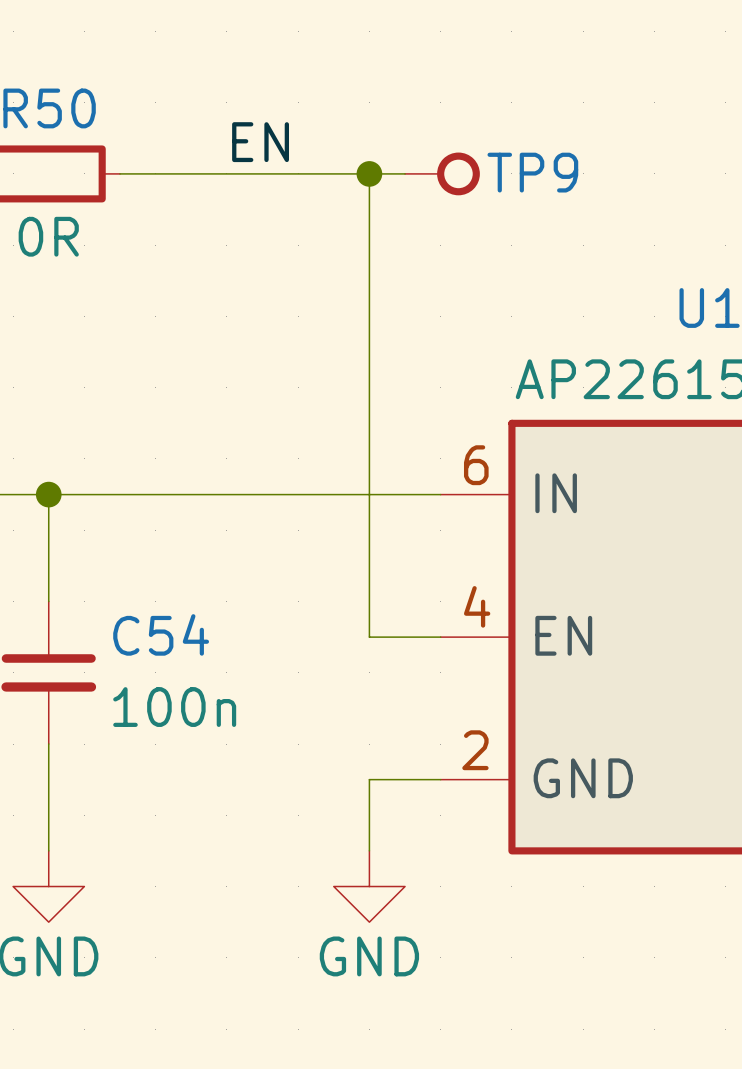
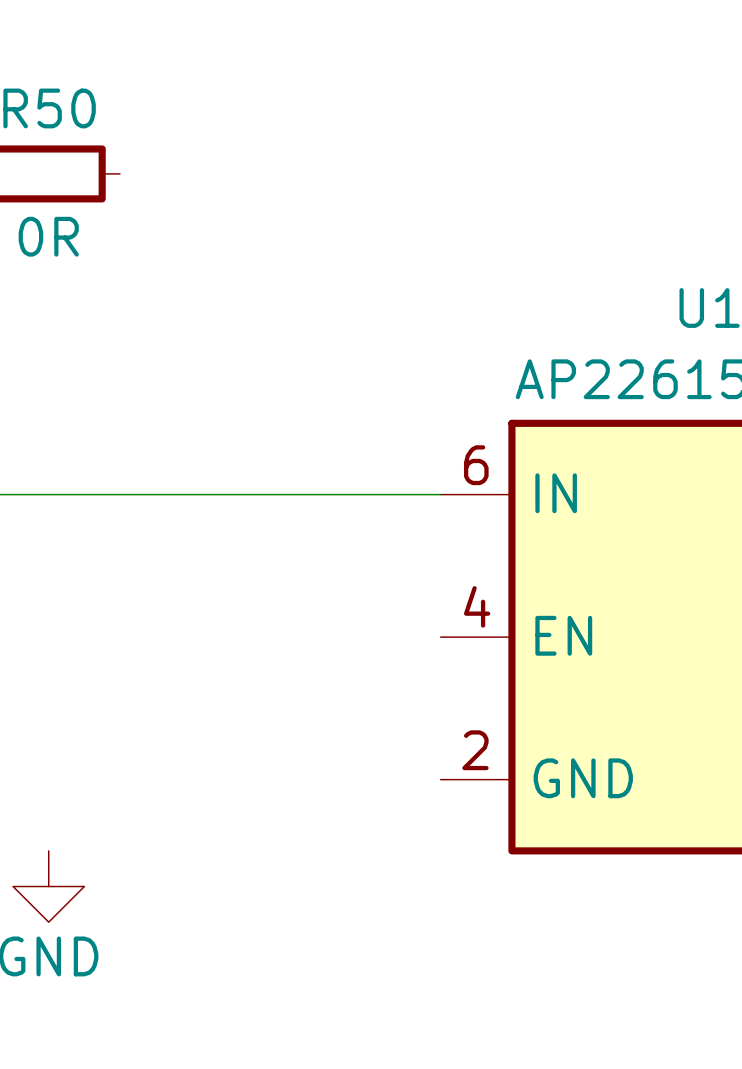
label: EN (260, 142) -> none
wire: (120, 173) (405, 173) -> none
wire: (369, 173) (369, 637) (440, 637) -> none
junction: (369, 173) -> none
TP9: (442, 173) -> none
wire: (48, 494) (48, 601) -> none
junction: (48, 494) -> none
C54: (48, 672) -> none
wire: (48, 744) (48, 850) -> none
wire: (440, 779) (369, 779) (369, 850) -> none
power symbol: GND (369, 886) -> none

